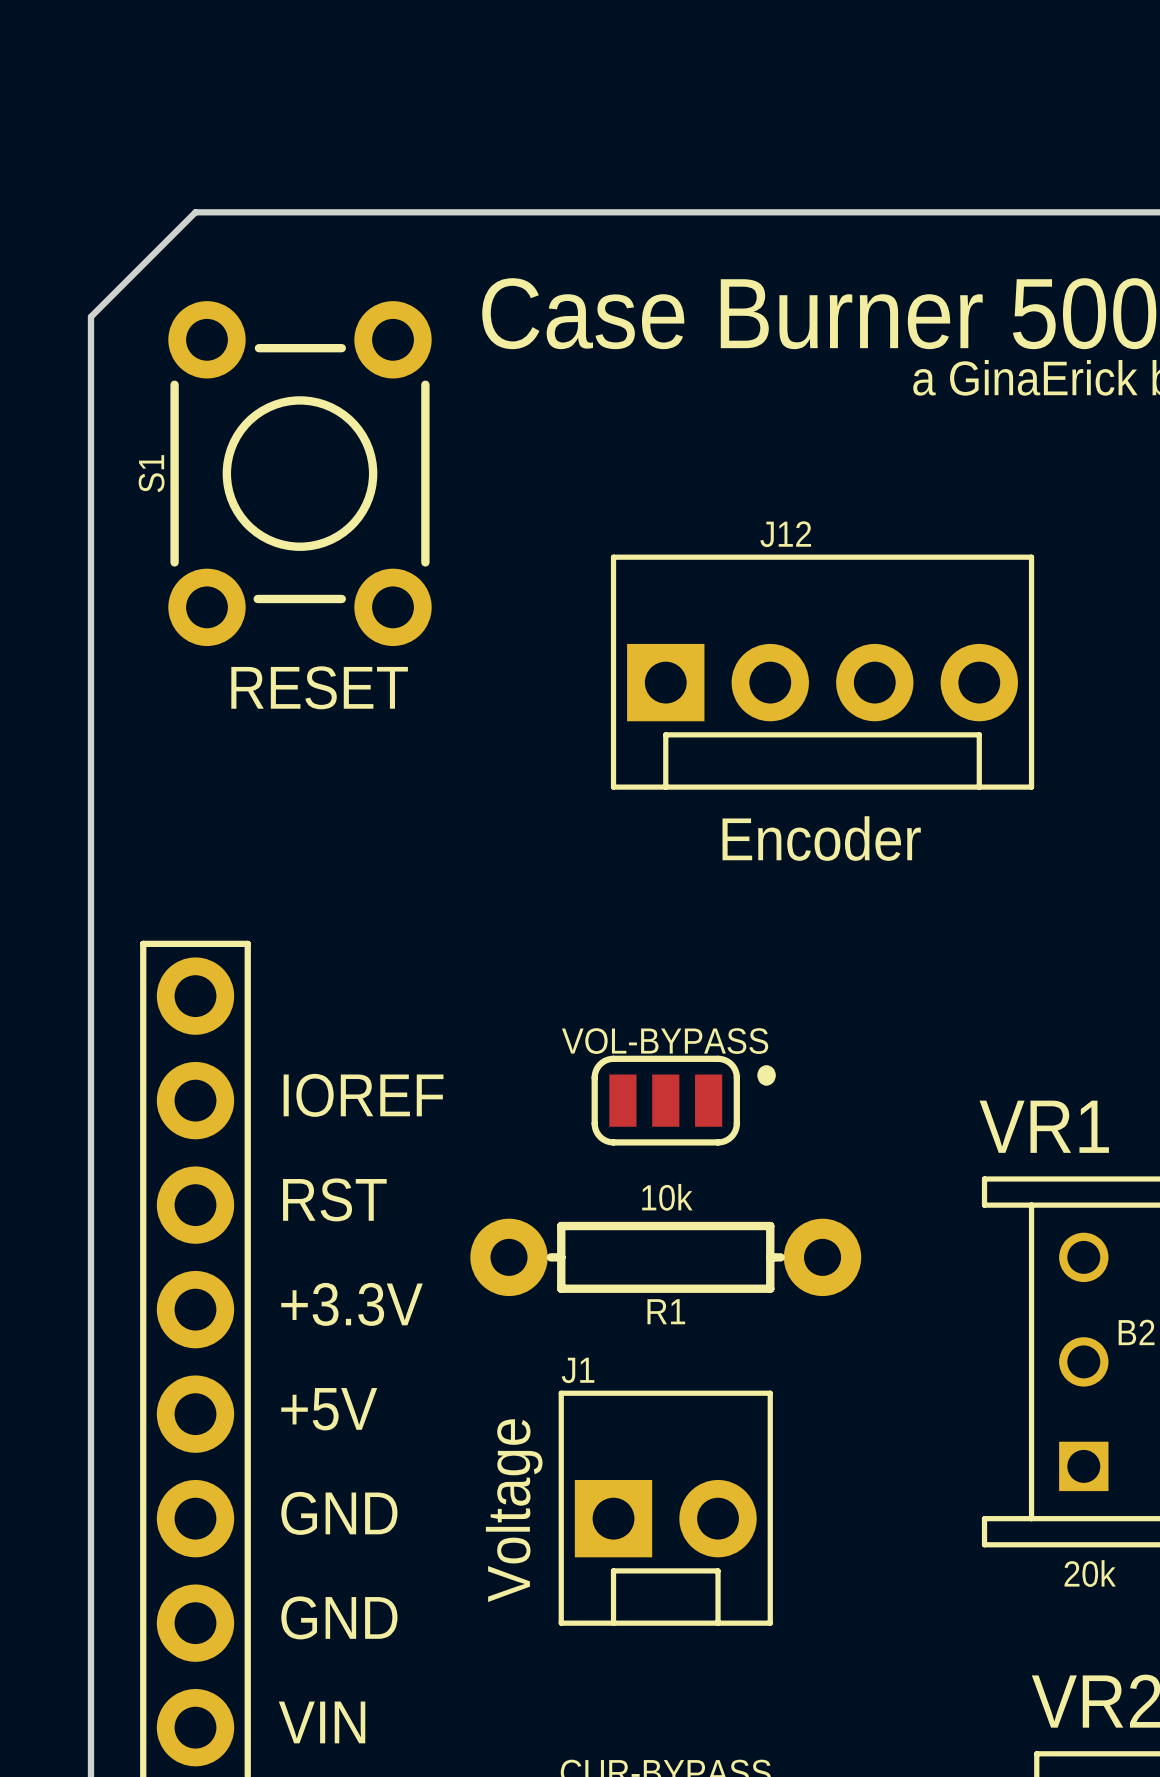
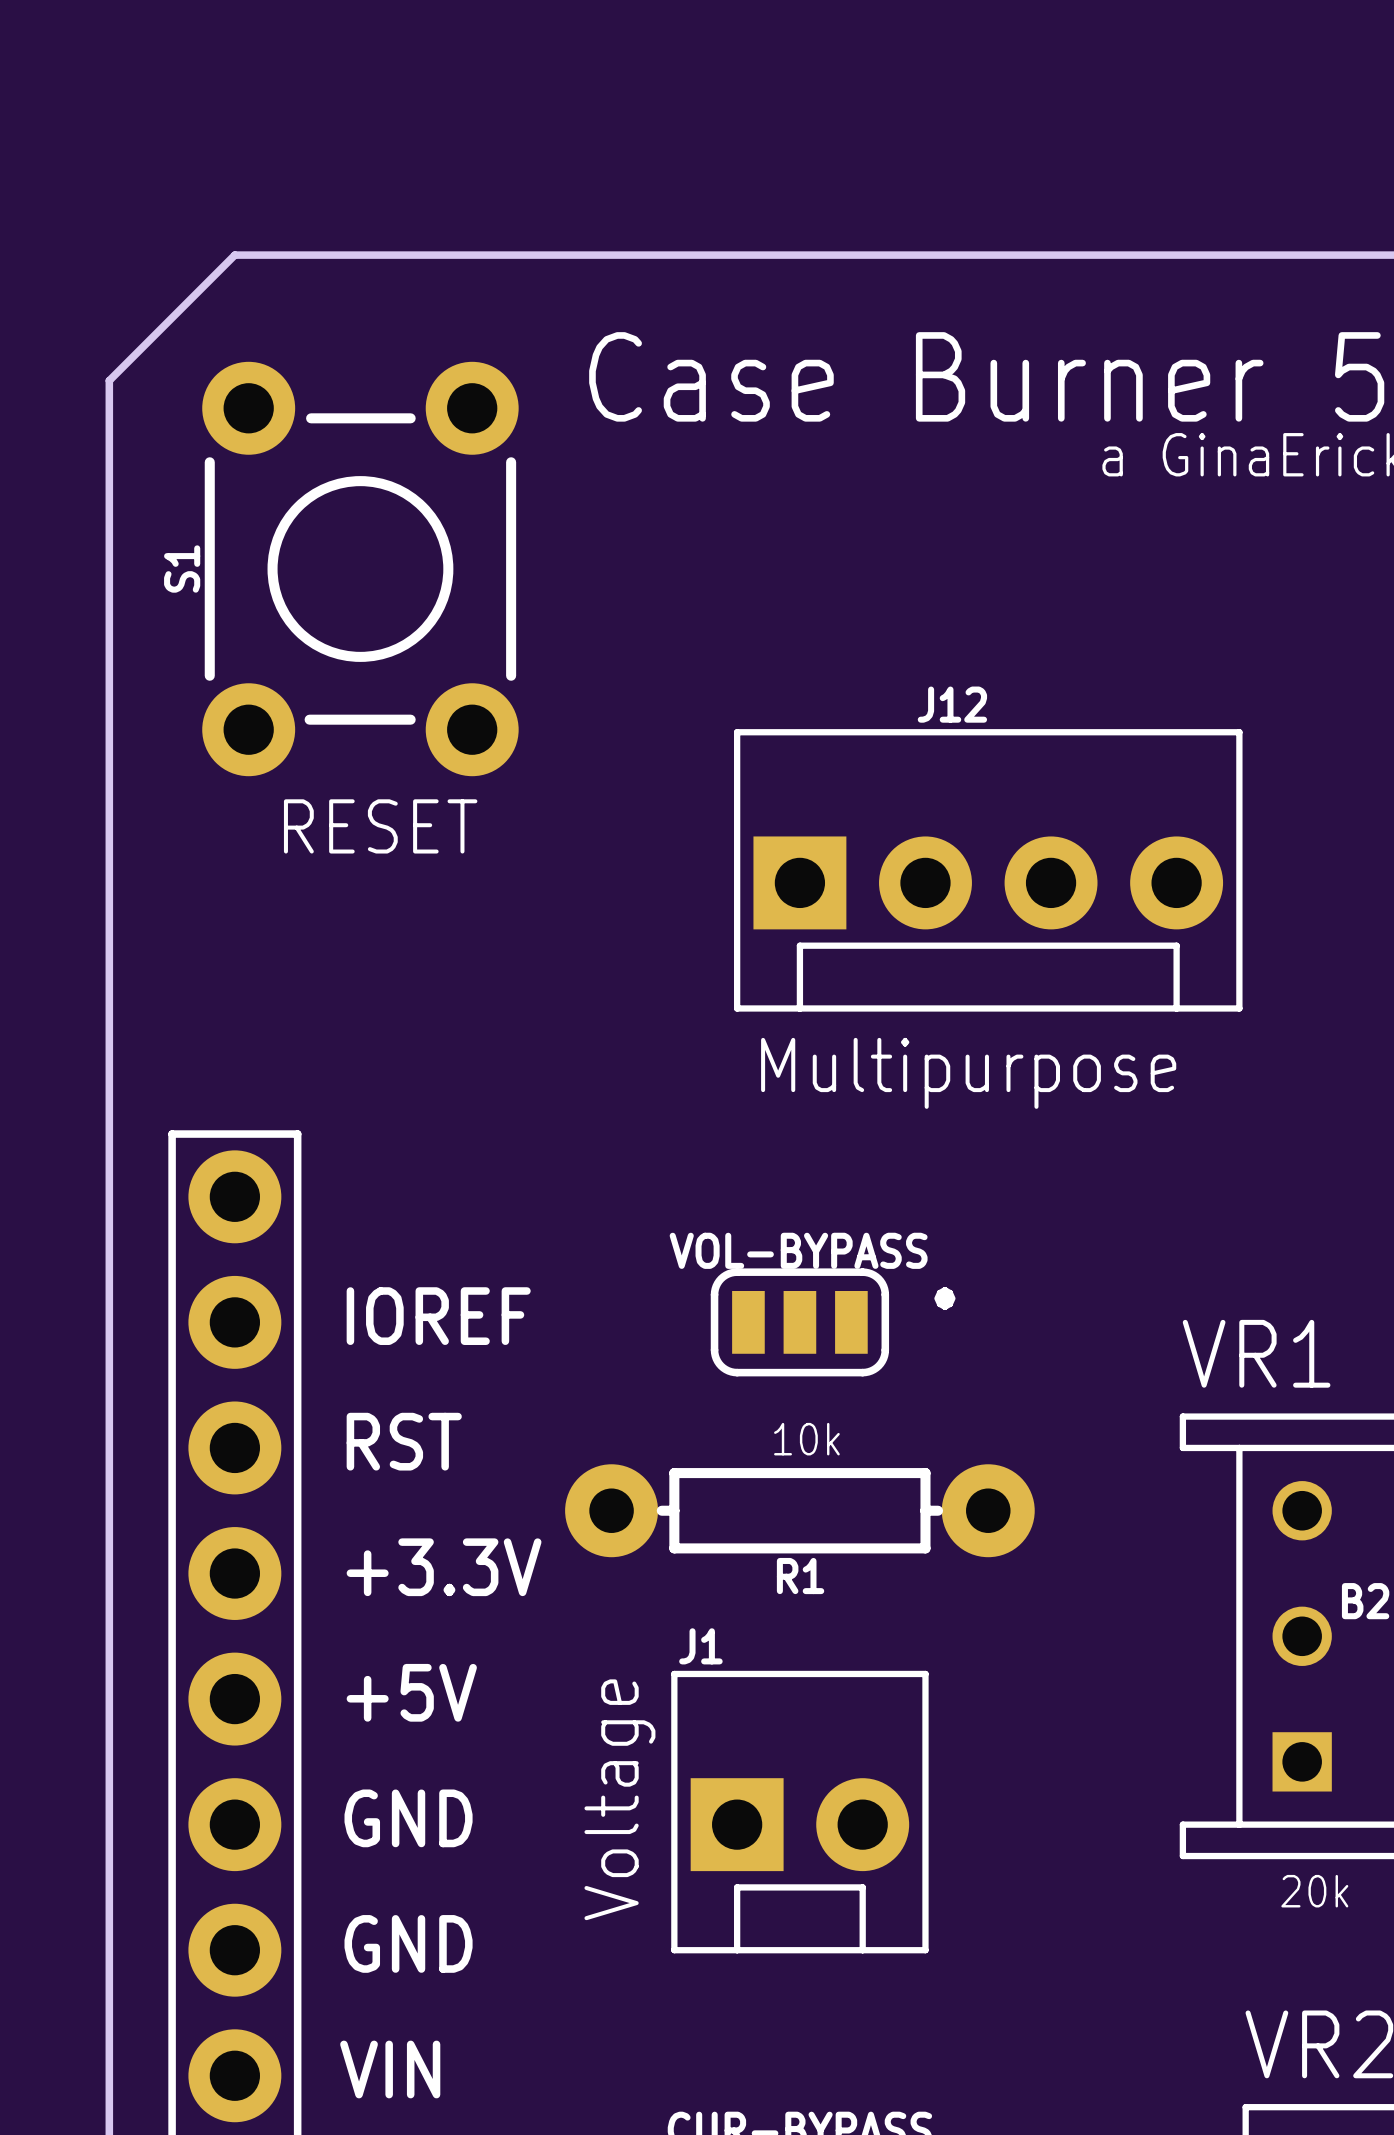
J12 position: (822, 672) -> (988, 870)
text: Encoder (821, 838) -> none
text: none -> Multipurpose (968, 1073)

